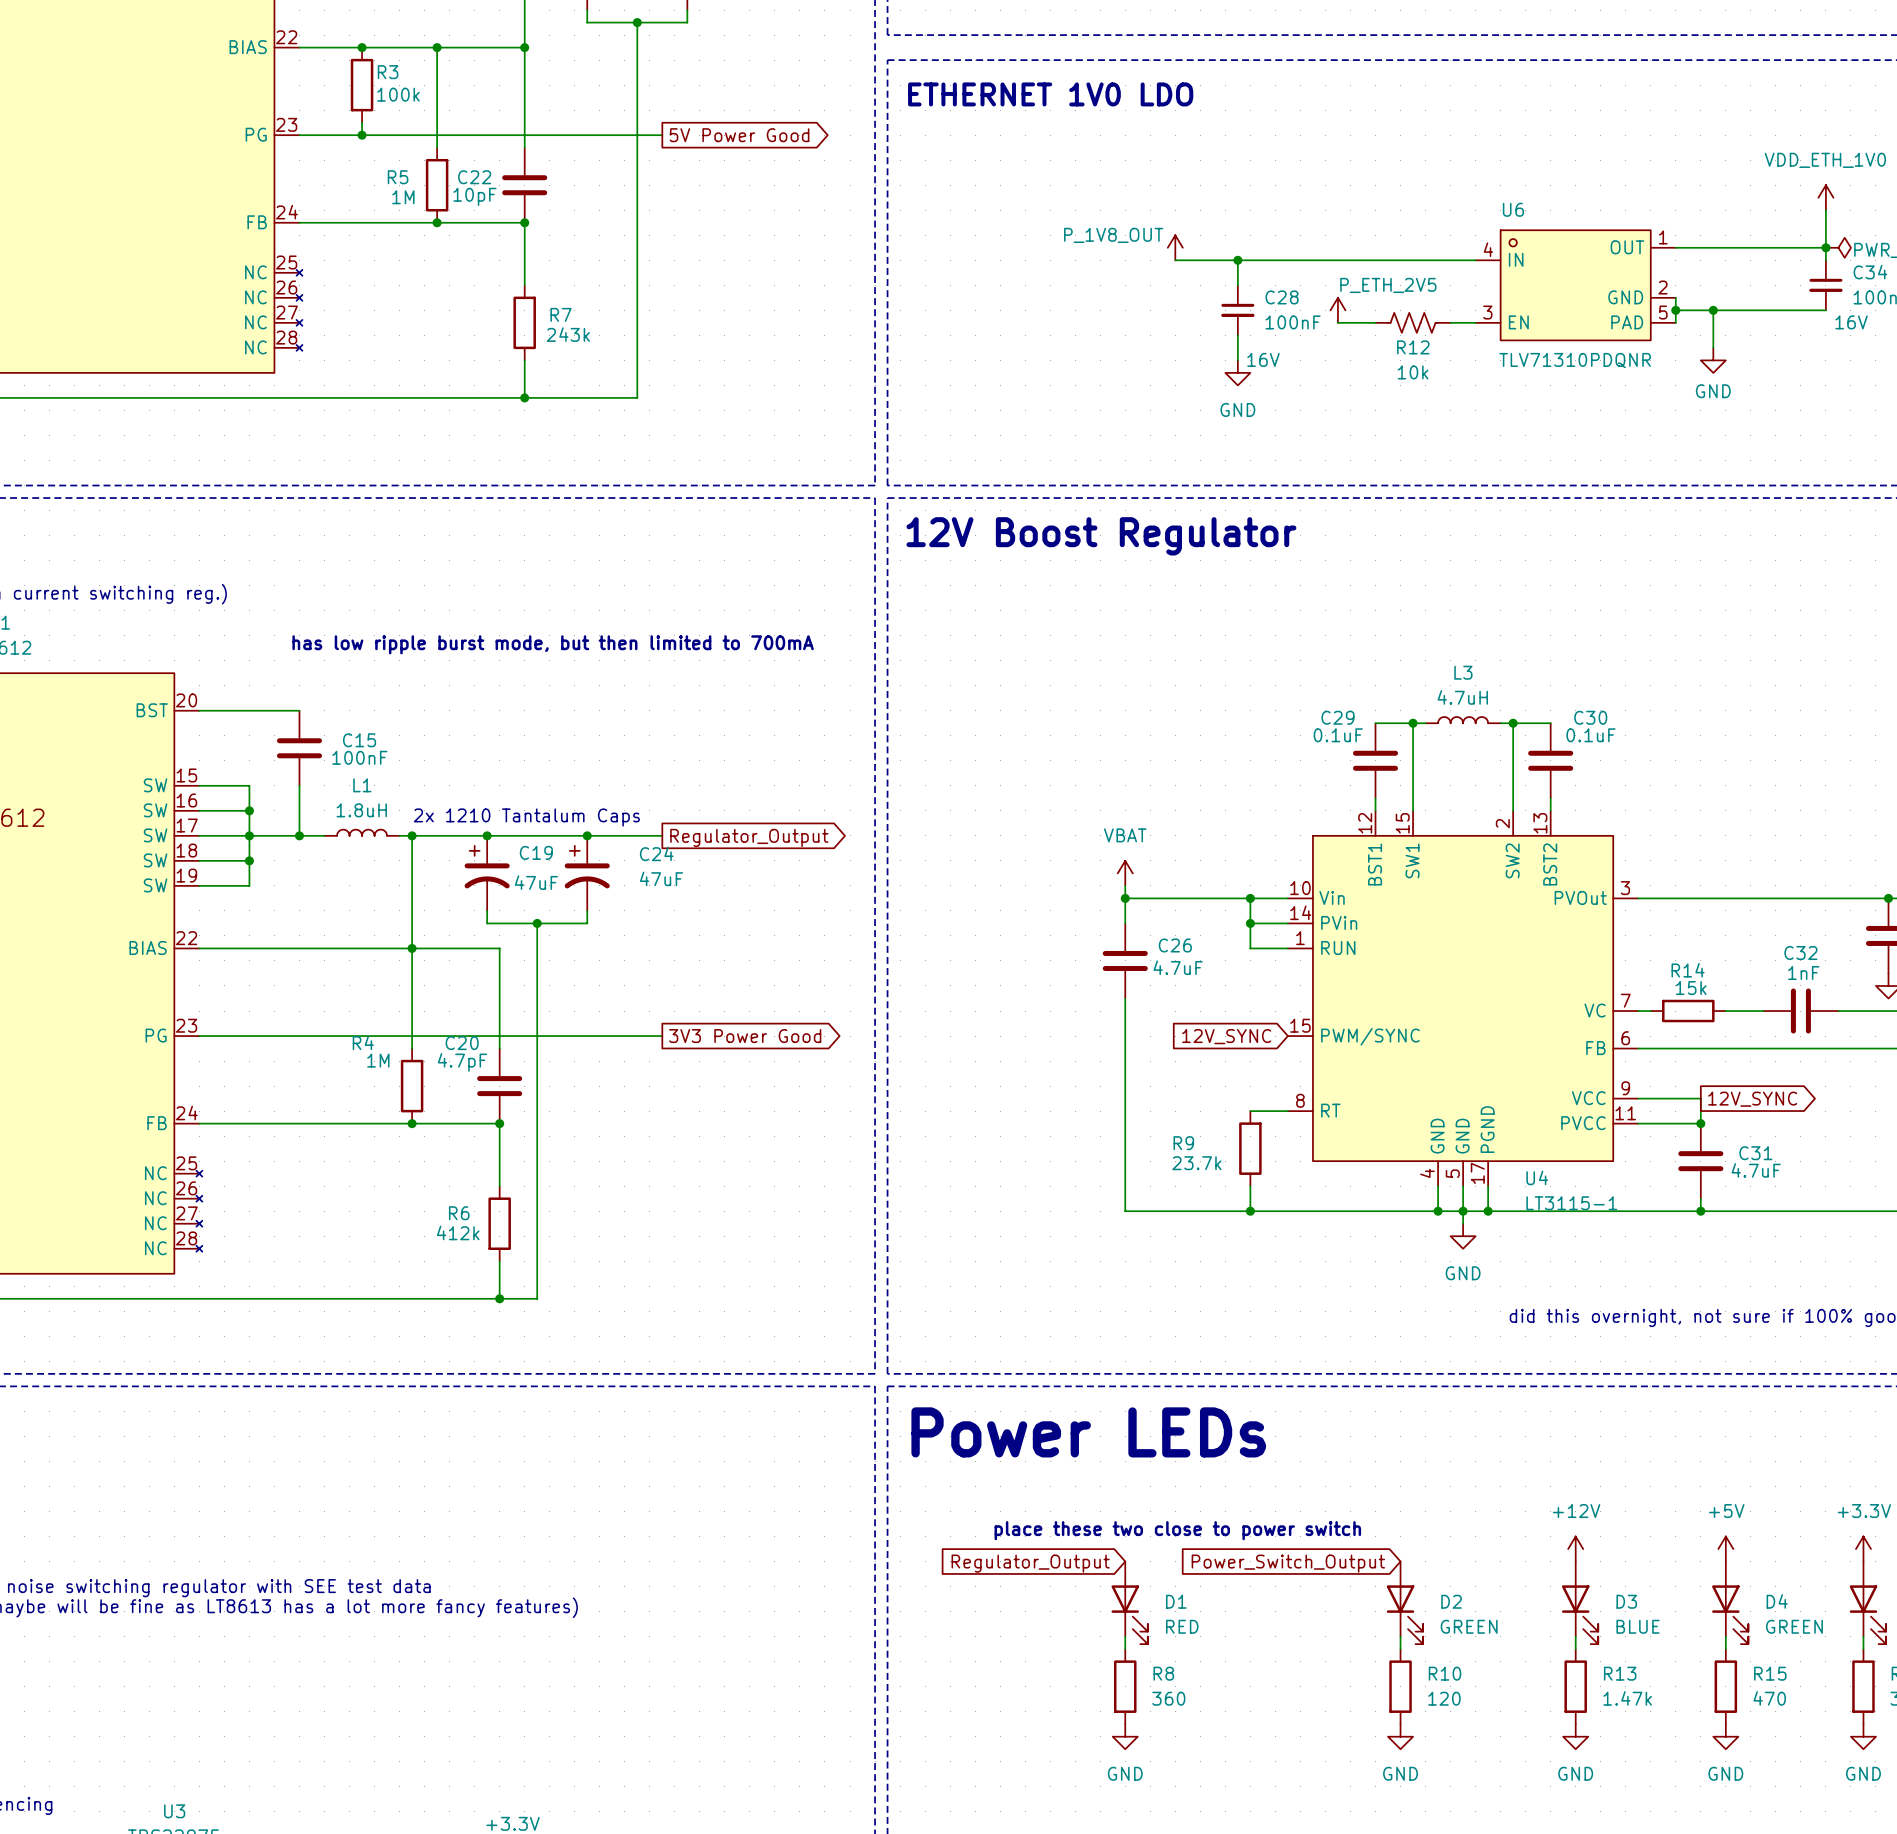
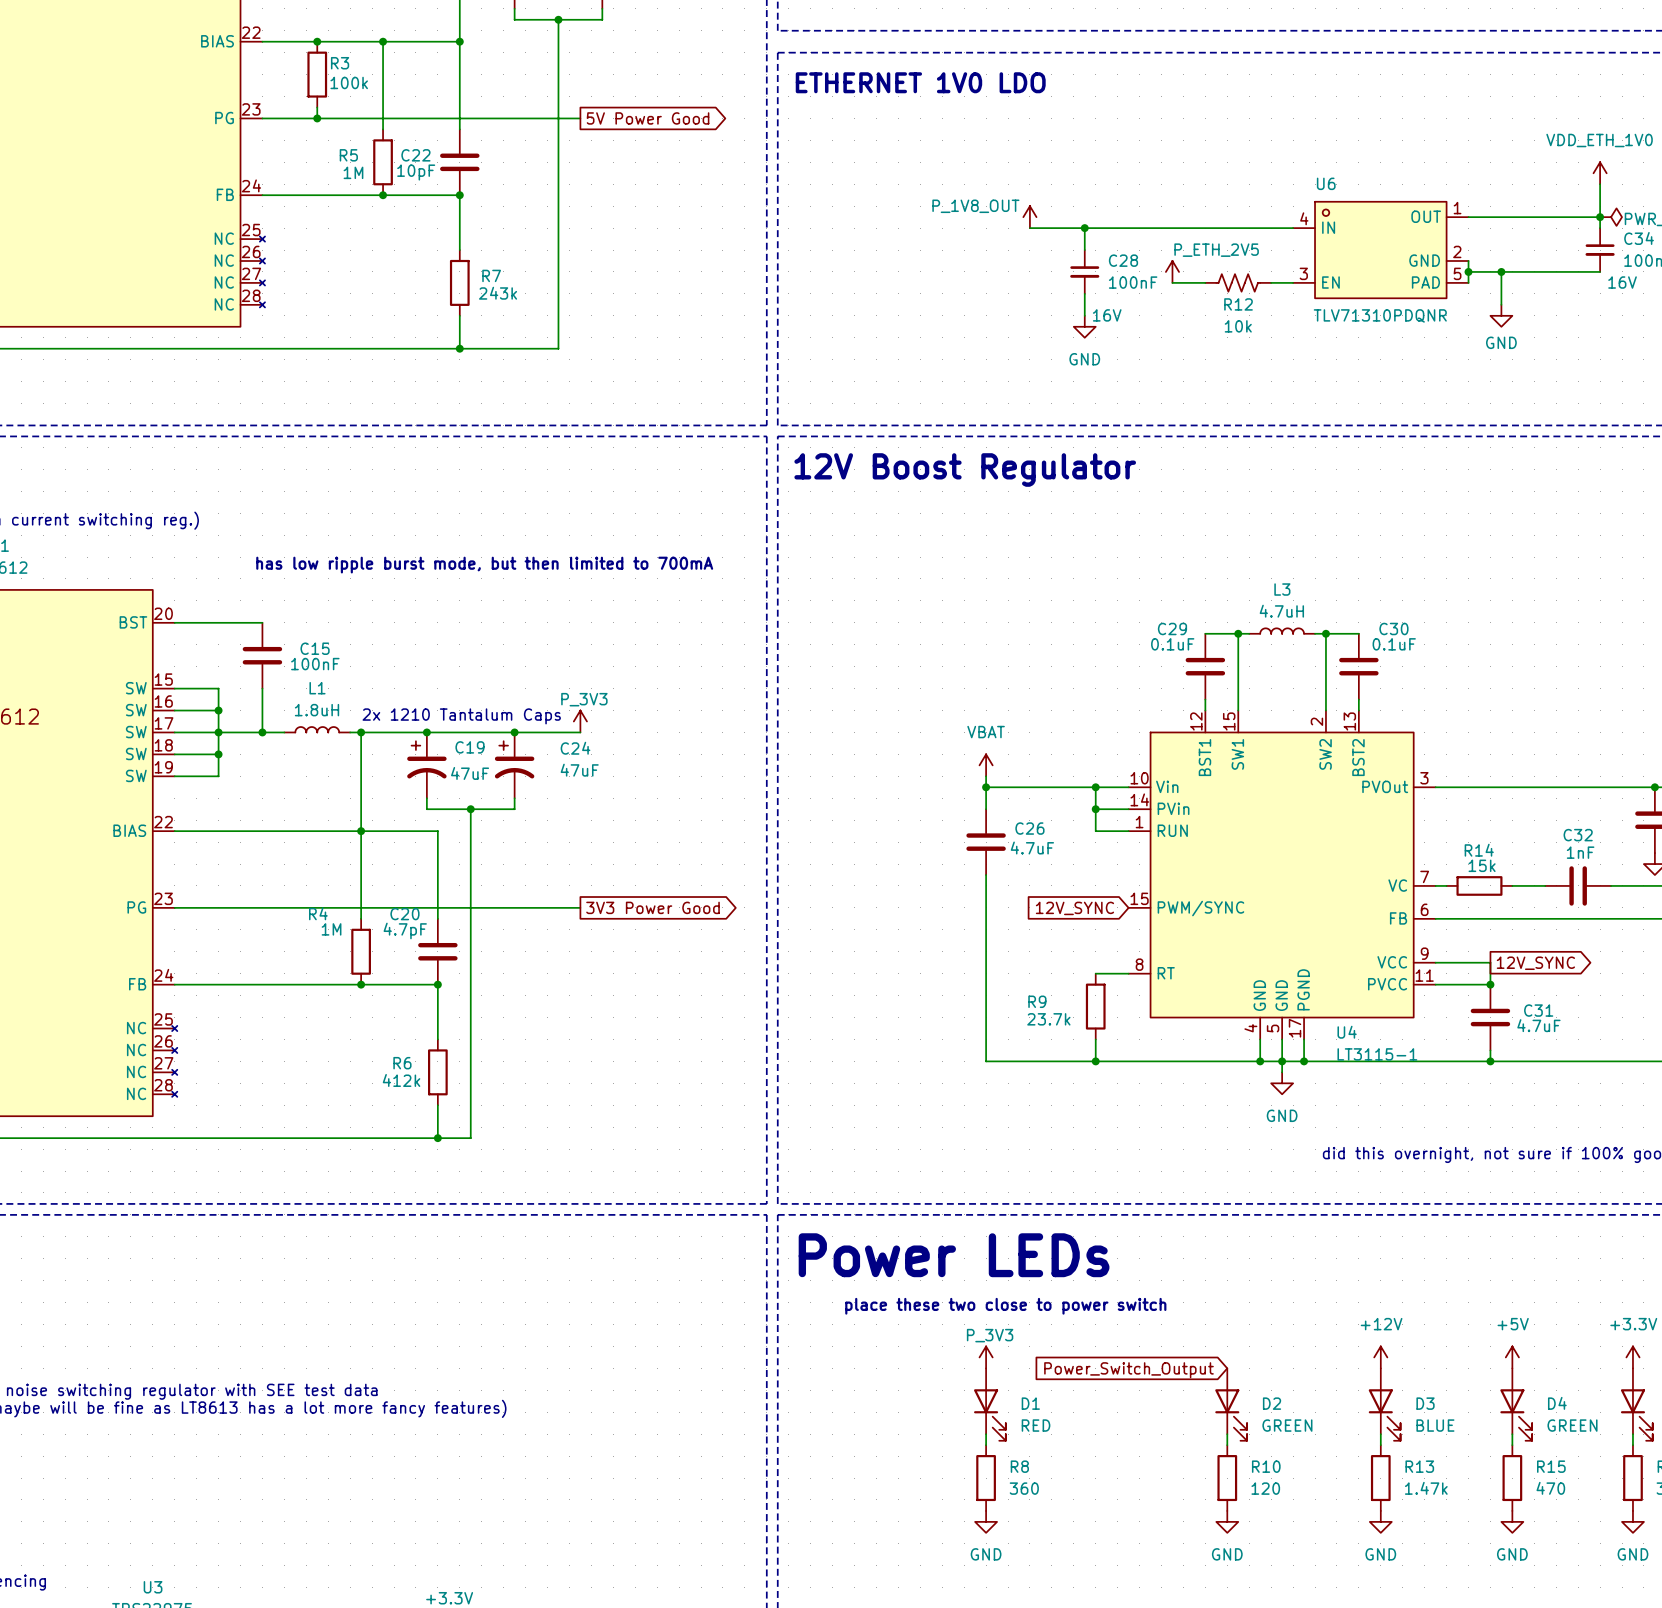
power symbol: none -> P_3V3 (580, 721)
global label: Regulator_Output (749, 837) -> none
text position: place these two close to power switch (1177, 1530) -> place these two close to power switch (1005, 1306)
power symbol: none -> P_3V3 (986, 1357)
global label: Regulator_Output (1030, 1563) -> none

